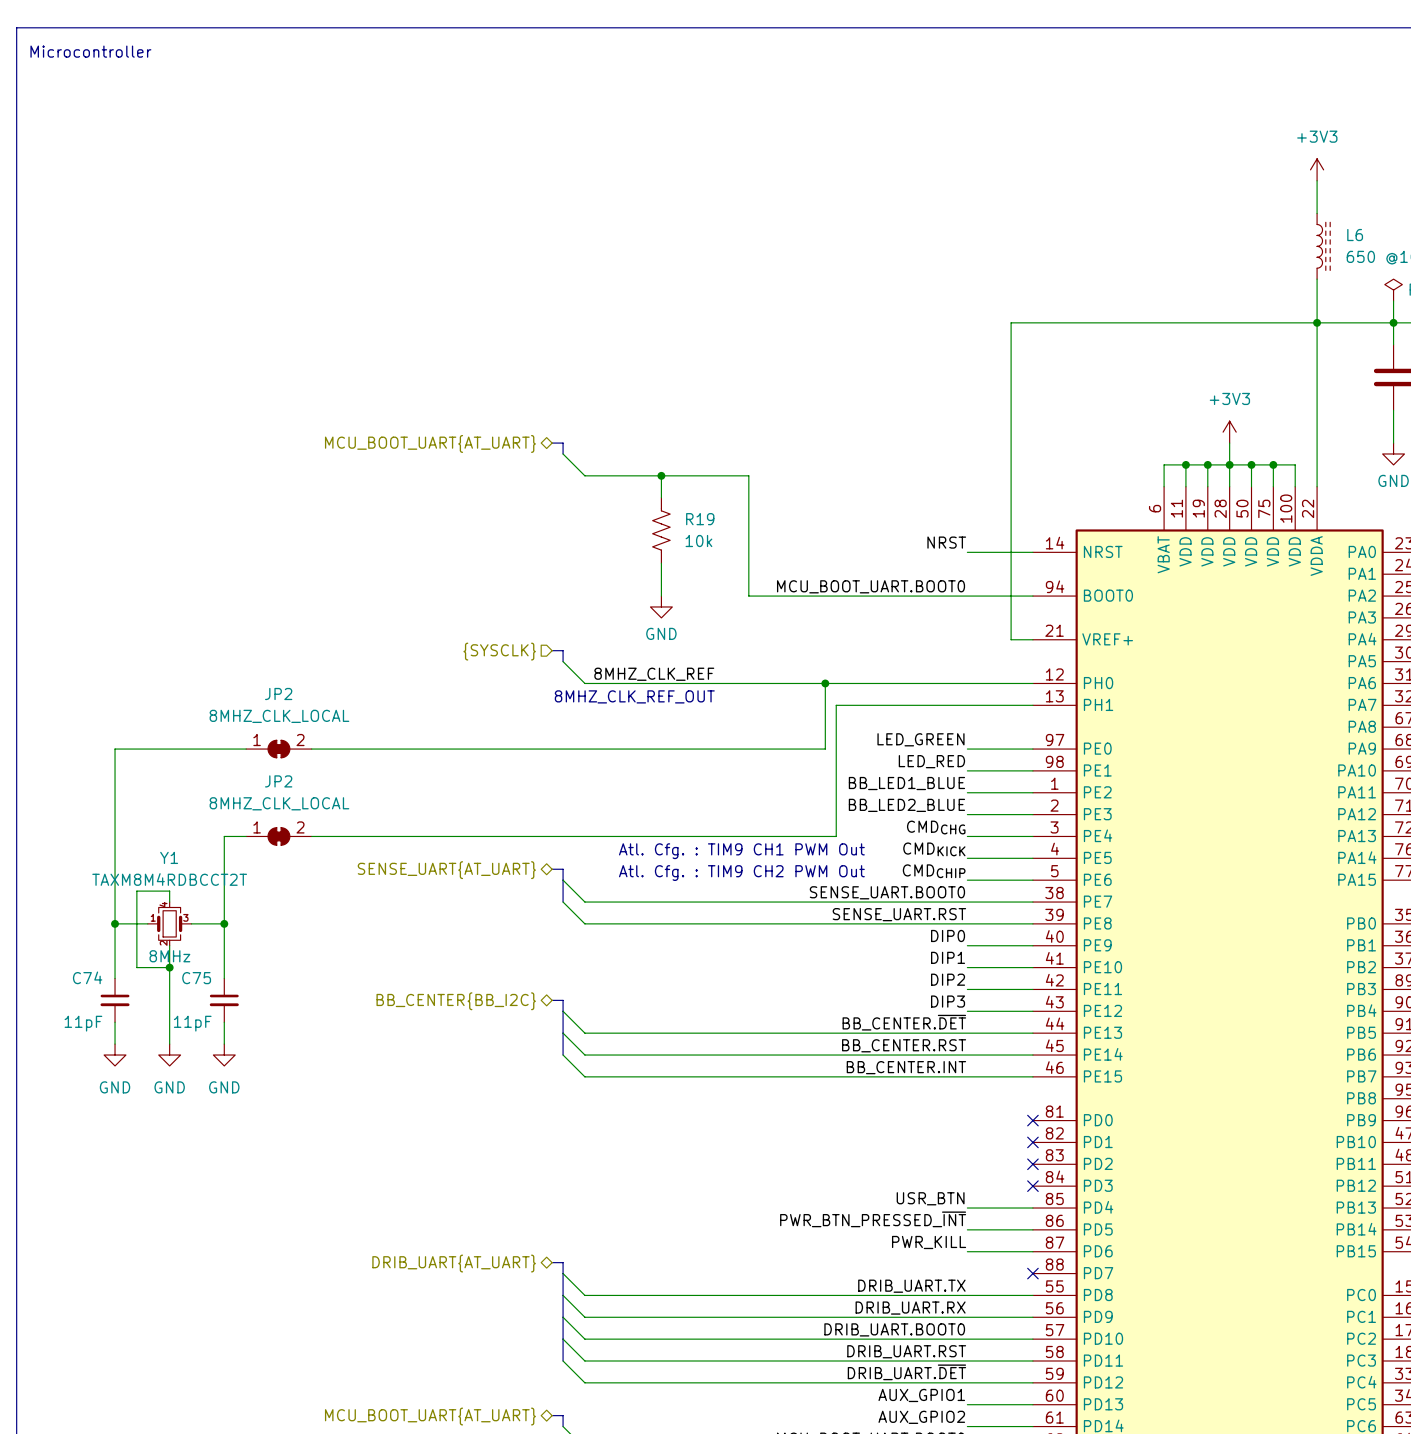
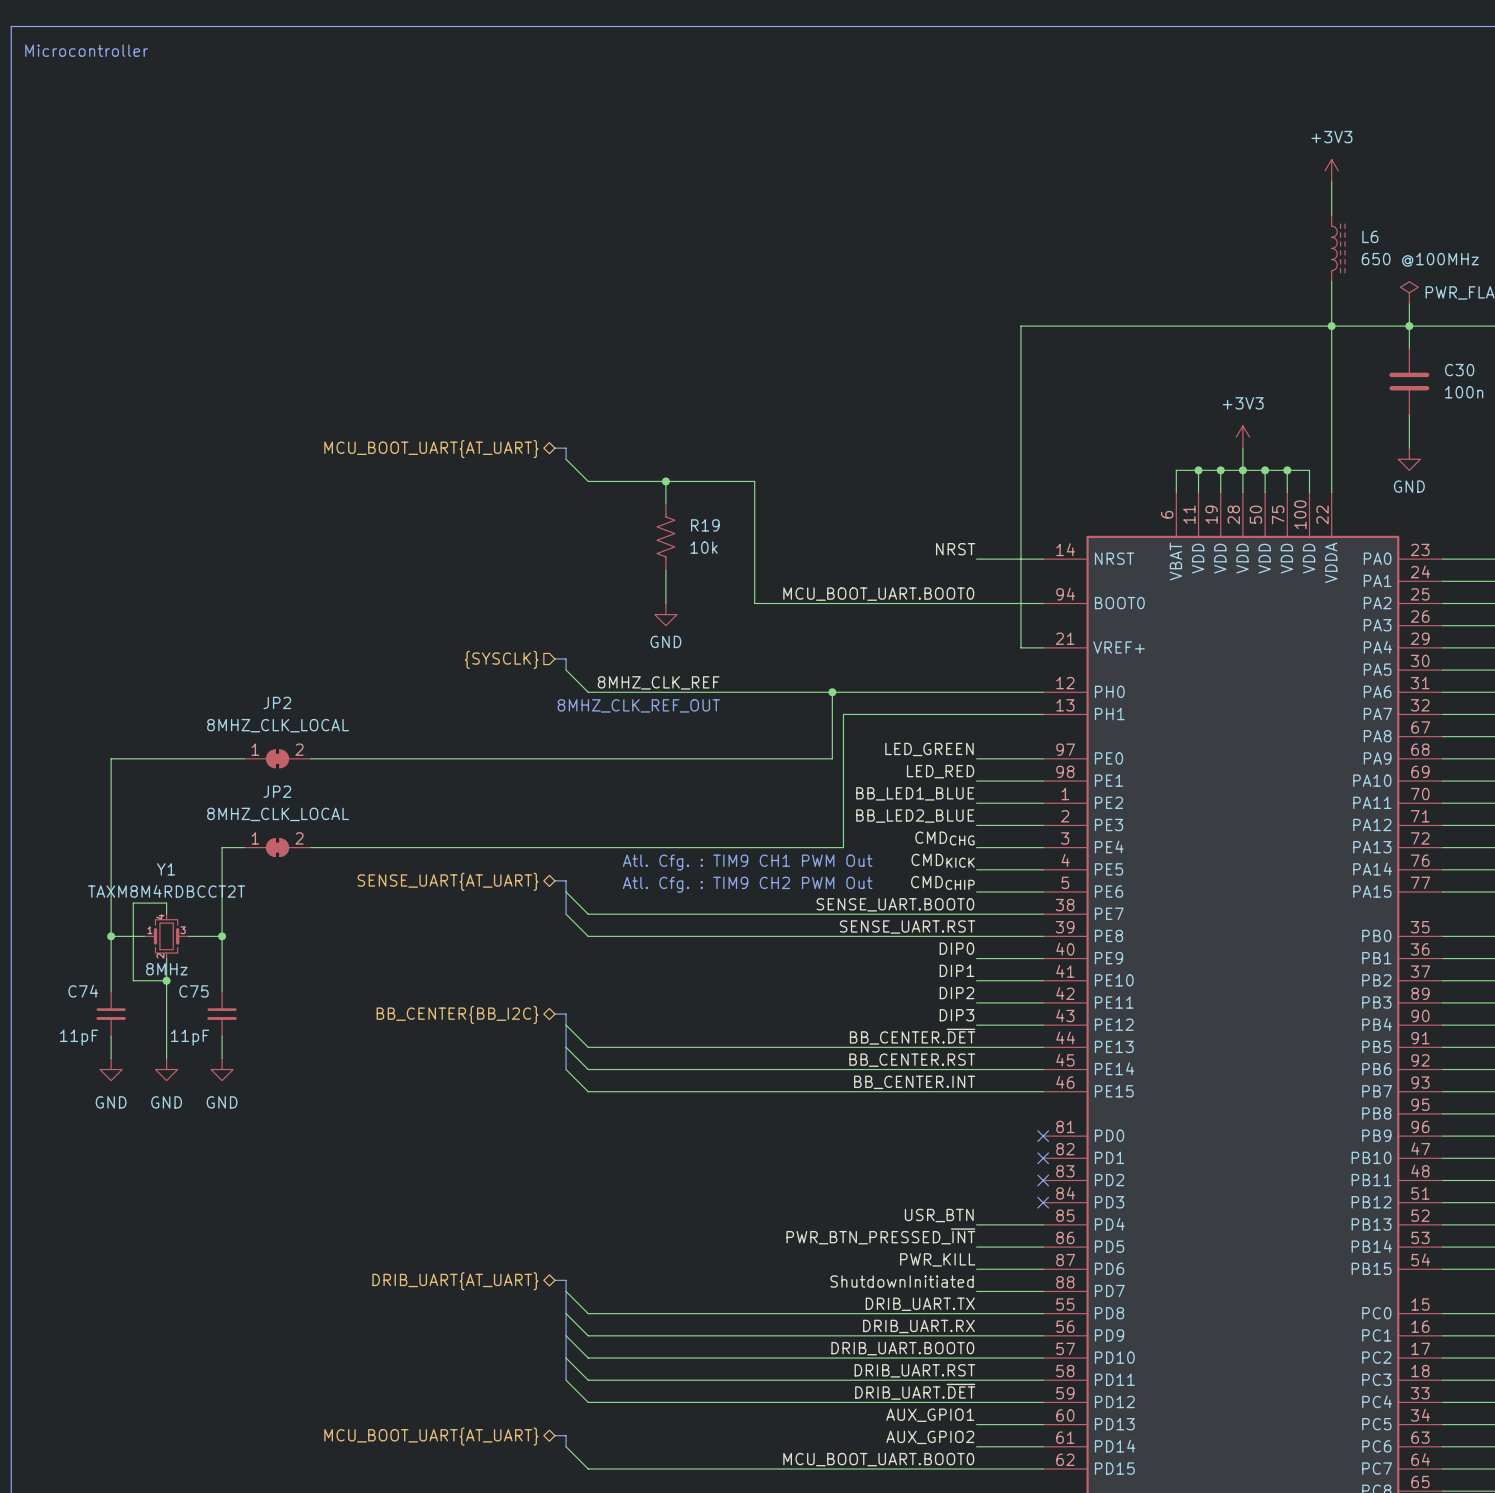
label: none -> ShutdownInitiated (902, 1281)
wire: none -> (976, 1291) (1043, 1291)
no-connect mark: (1032, 1273) -> none

